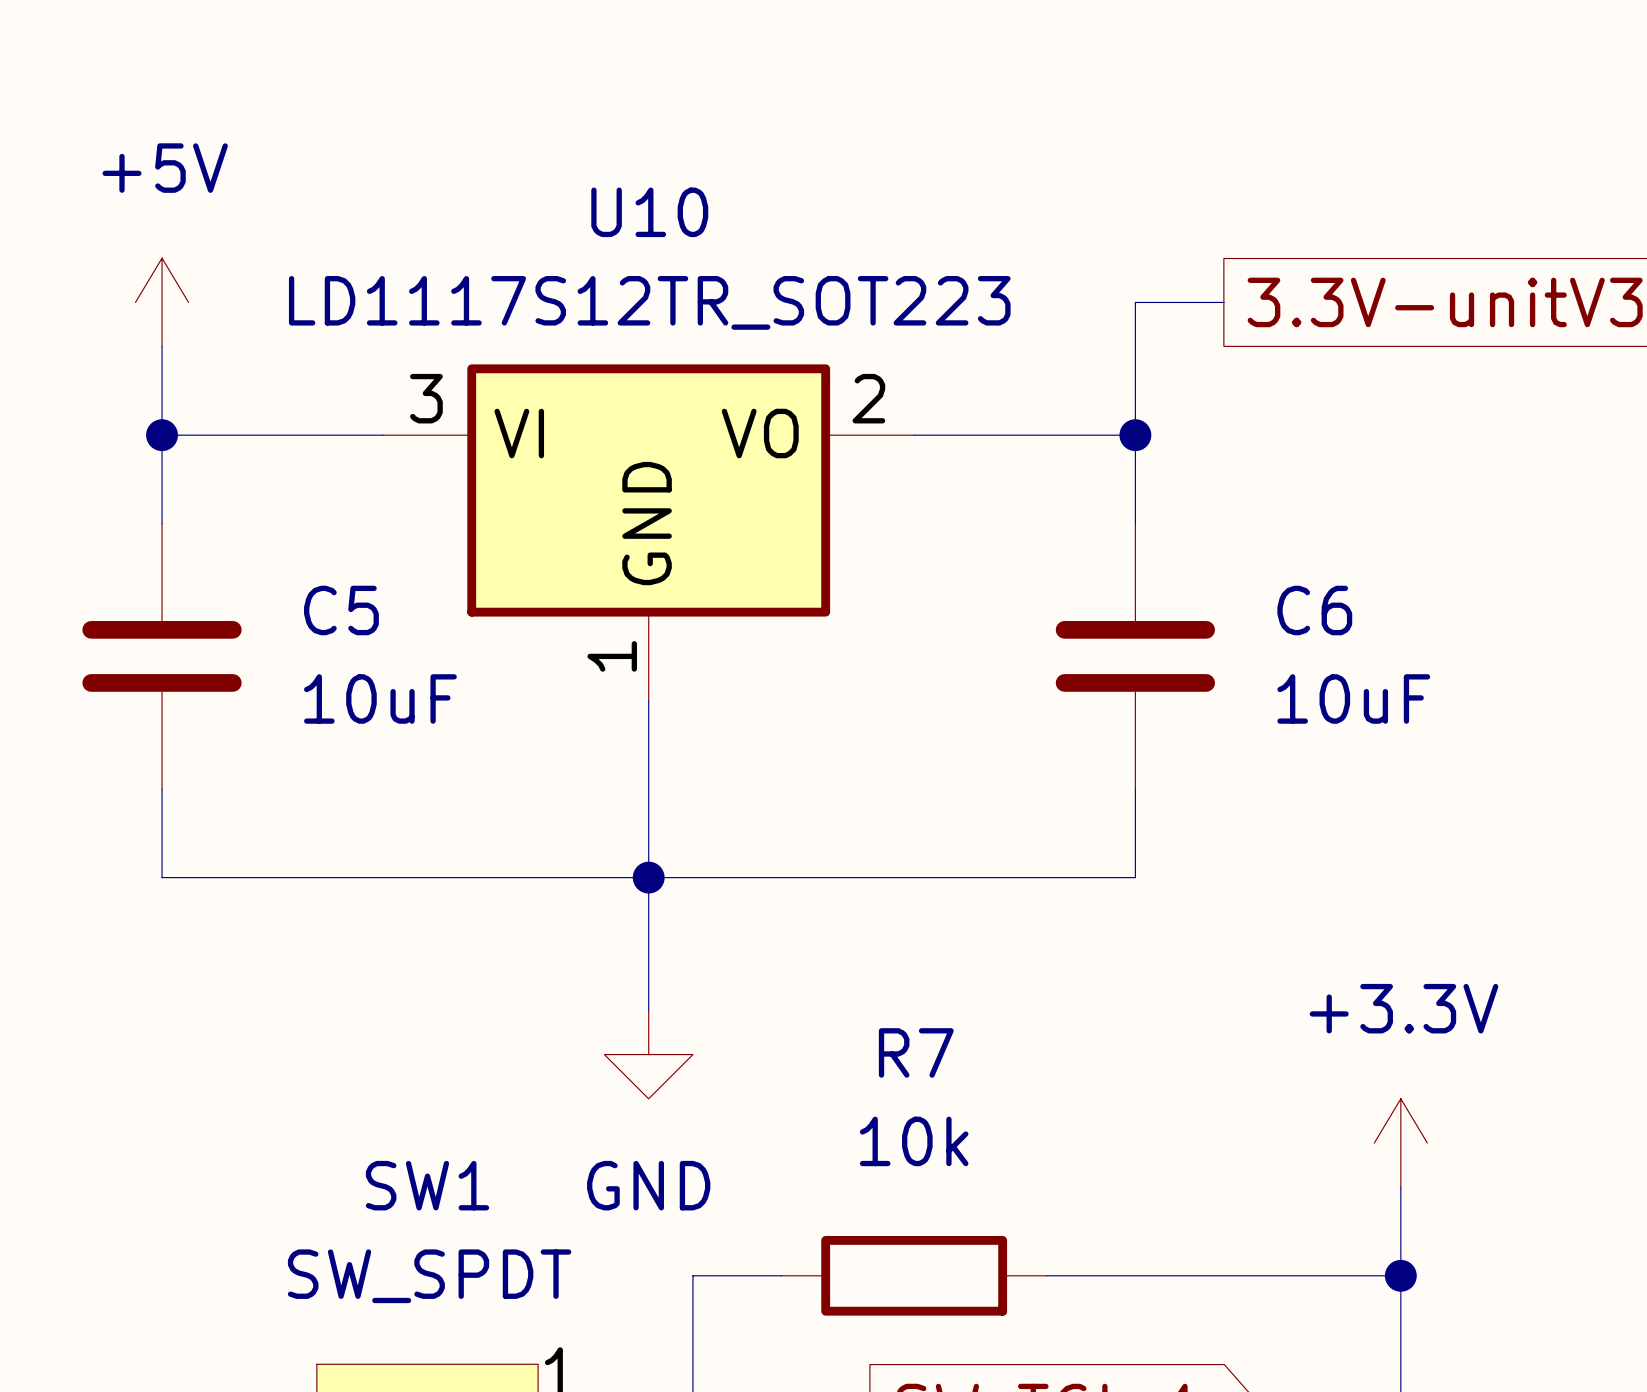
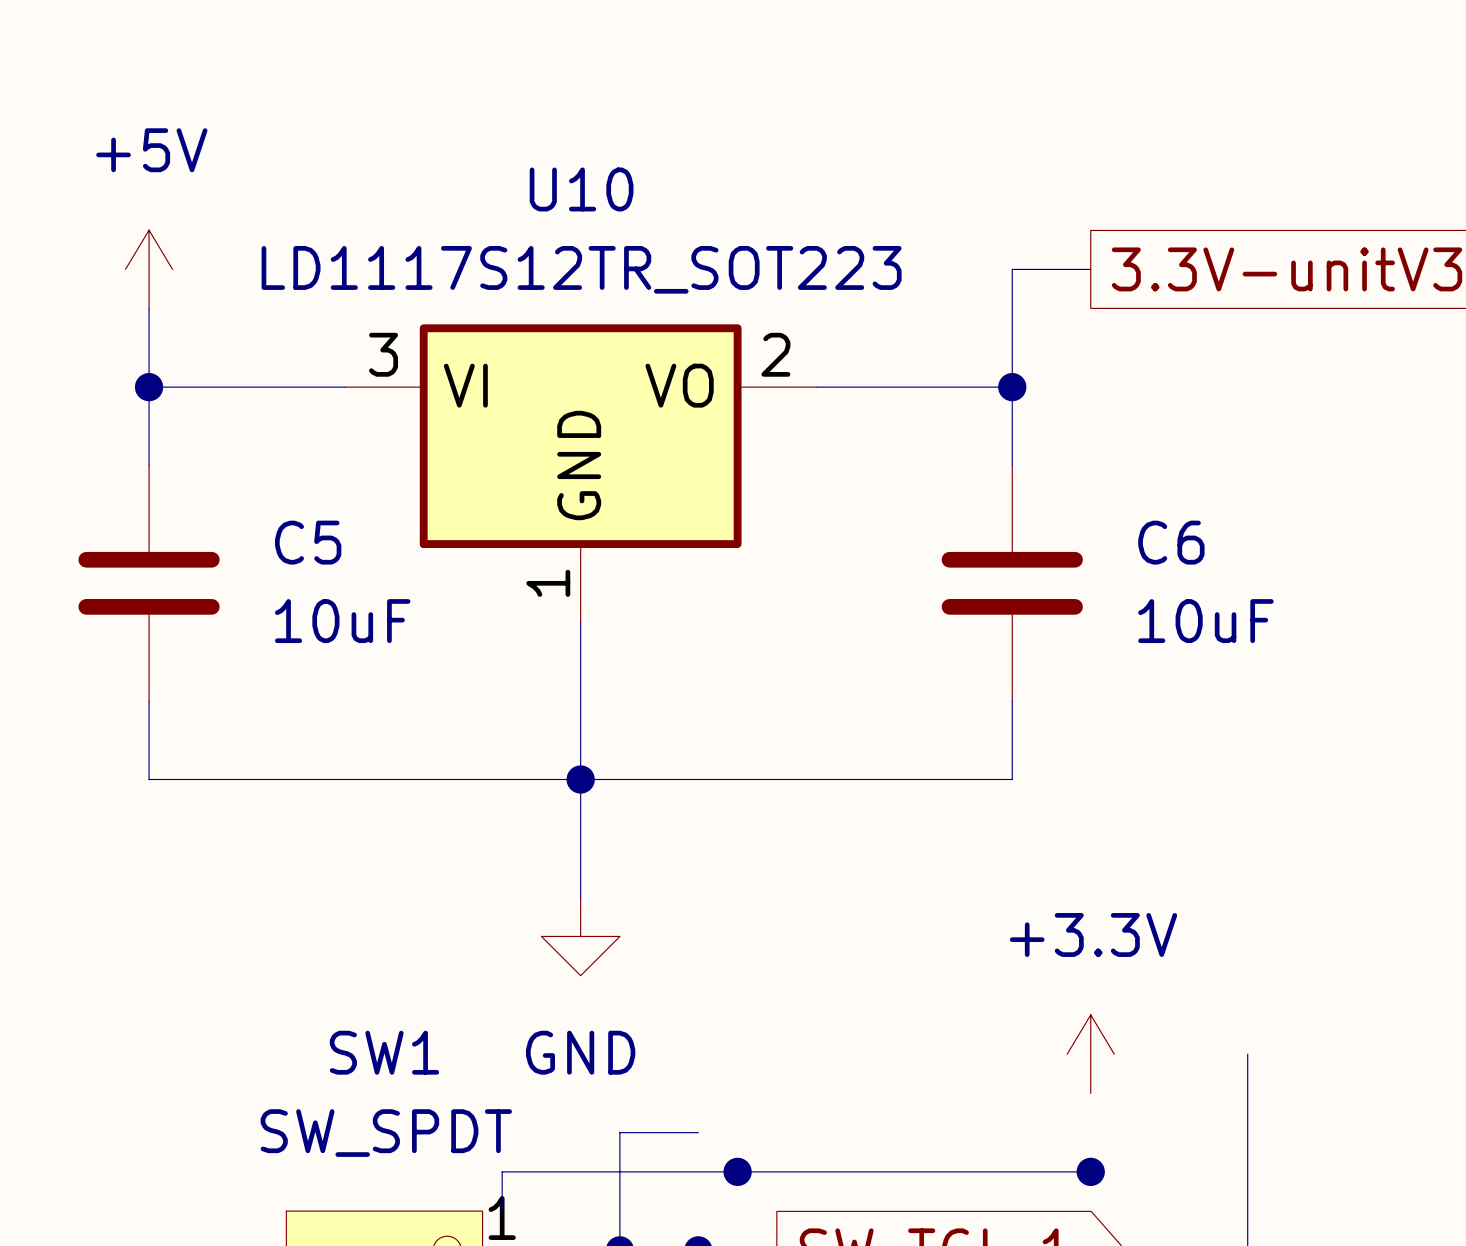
power symbol position: +3.3V (1400, 1143) -> +3.3V (1090, 1054)
R7: 10k (914, 1275) -> none
wire: (1046, 1275) (1400, 1275) -> none
junction position: (1400, 1275) -> (1090, 1171)
junction: none -> (737, 1171)
wire: none -> (1090, 1171) (502, 1171) (502, 1211)

